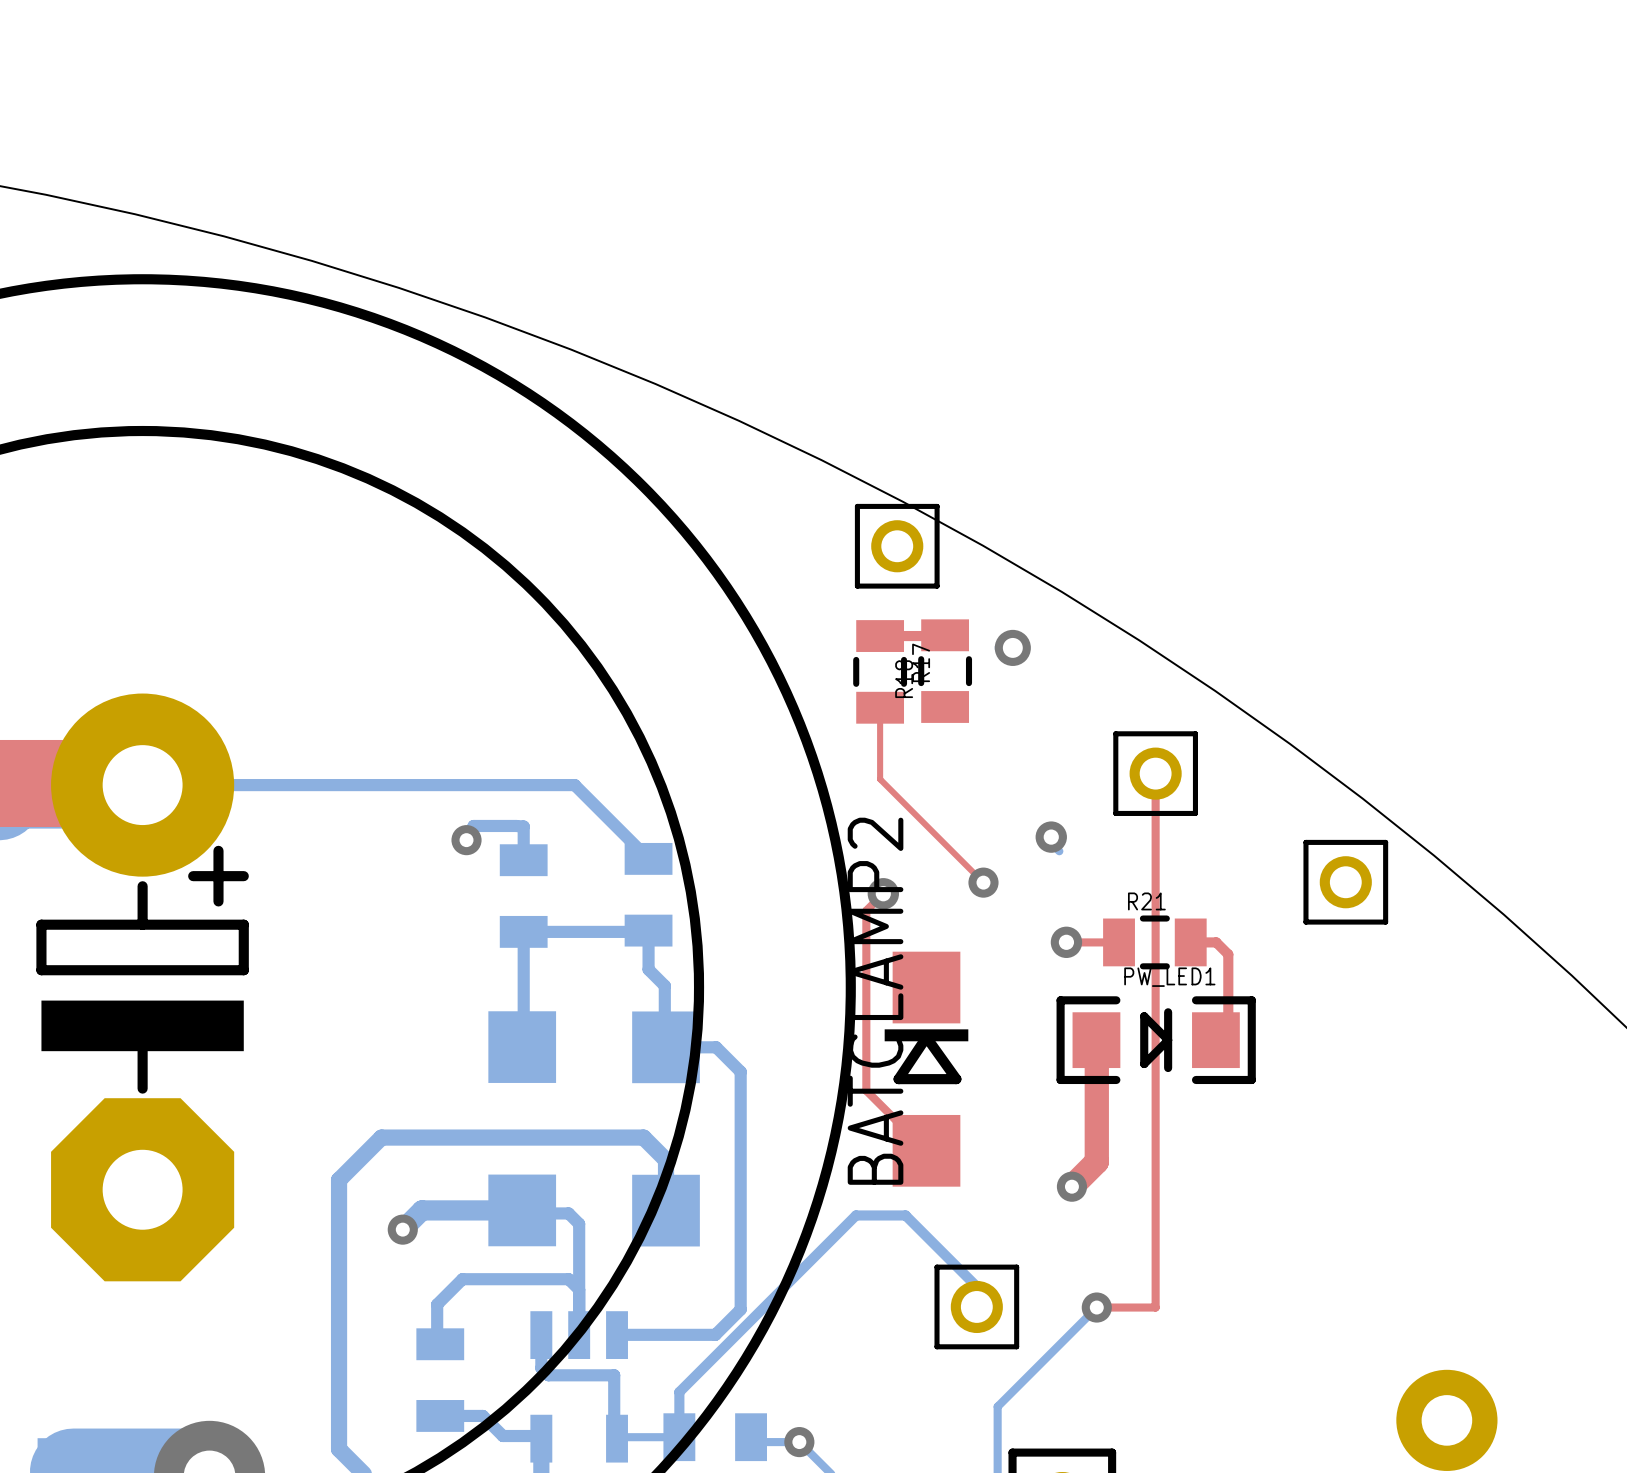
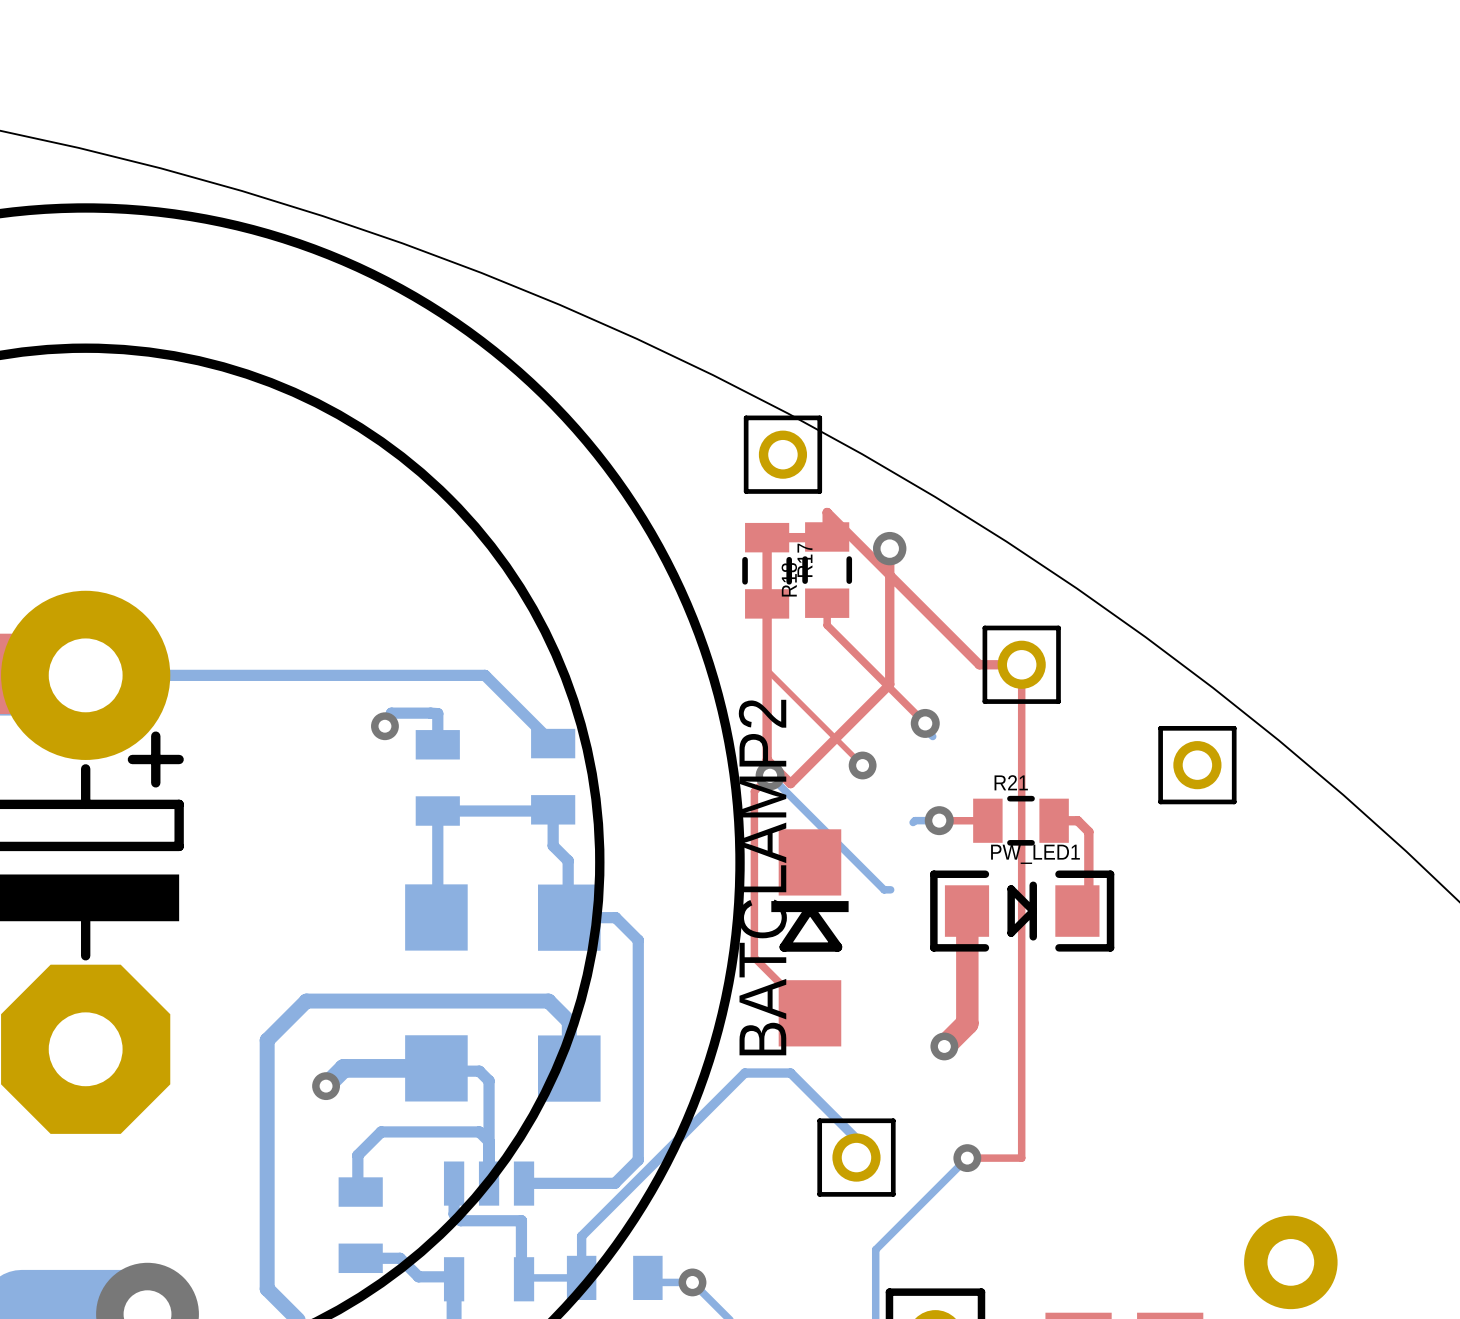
top track: none -> (827, 536) (827, 512) (979, 664) (1021, 664)
top track: none -> (767, 537) (767, 760) (790, 783) (889, 684) (889, 548)
top track: none -> (827, 603) (827, 625) (925, 723)
bottom track: none -> (770, 775) (884, 889) (890, 889)
bottom track: none -> (939, 820) (914, 820) (913, 822)

